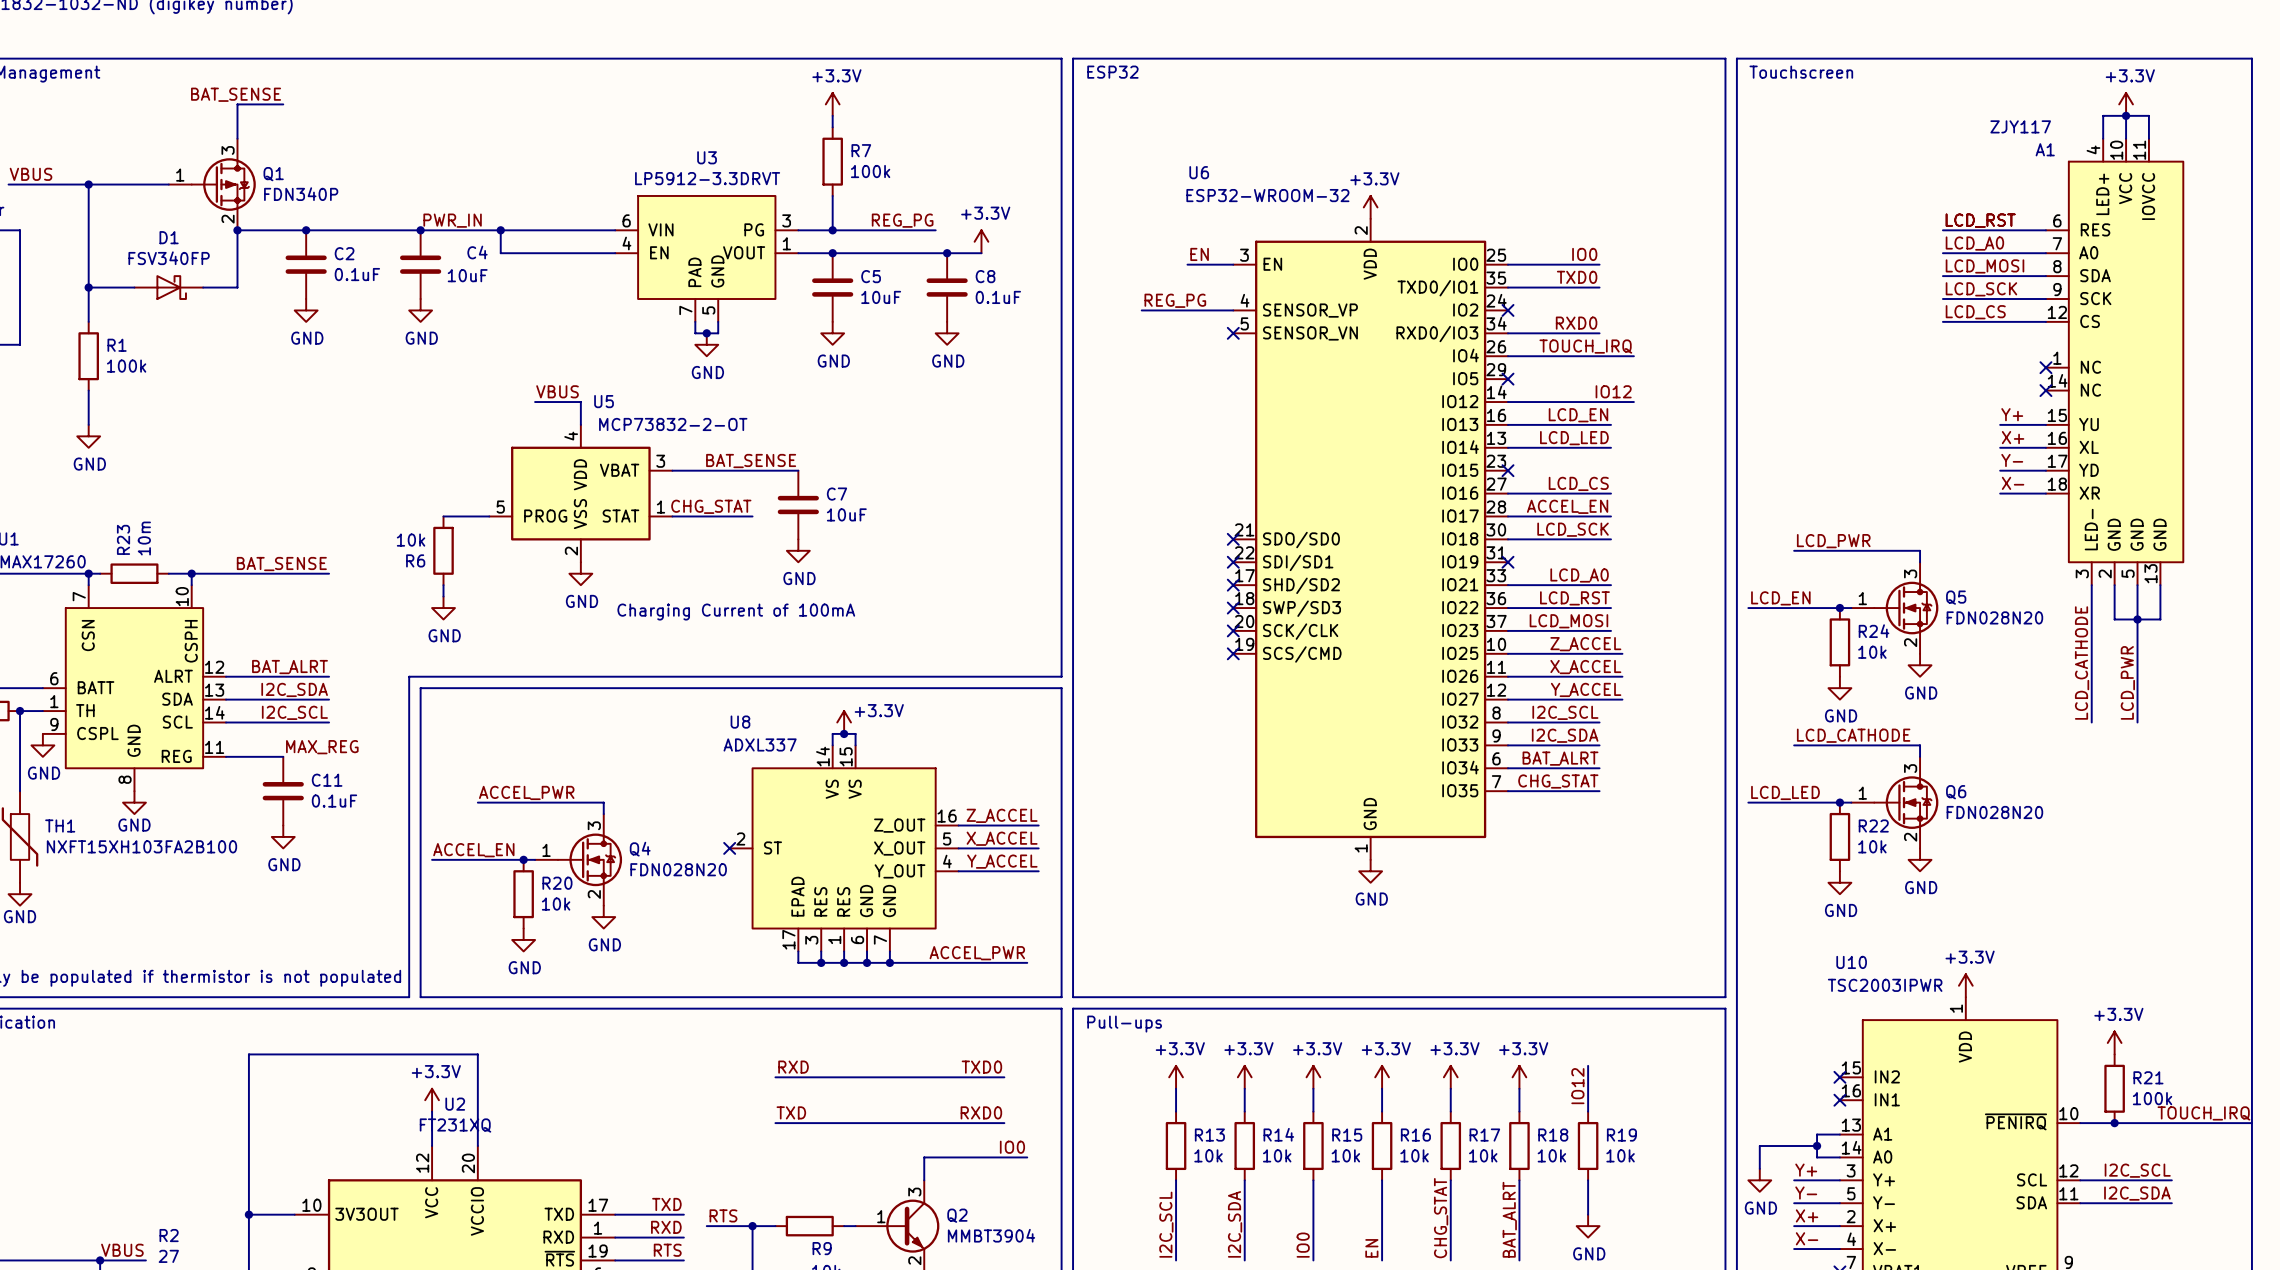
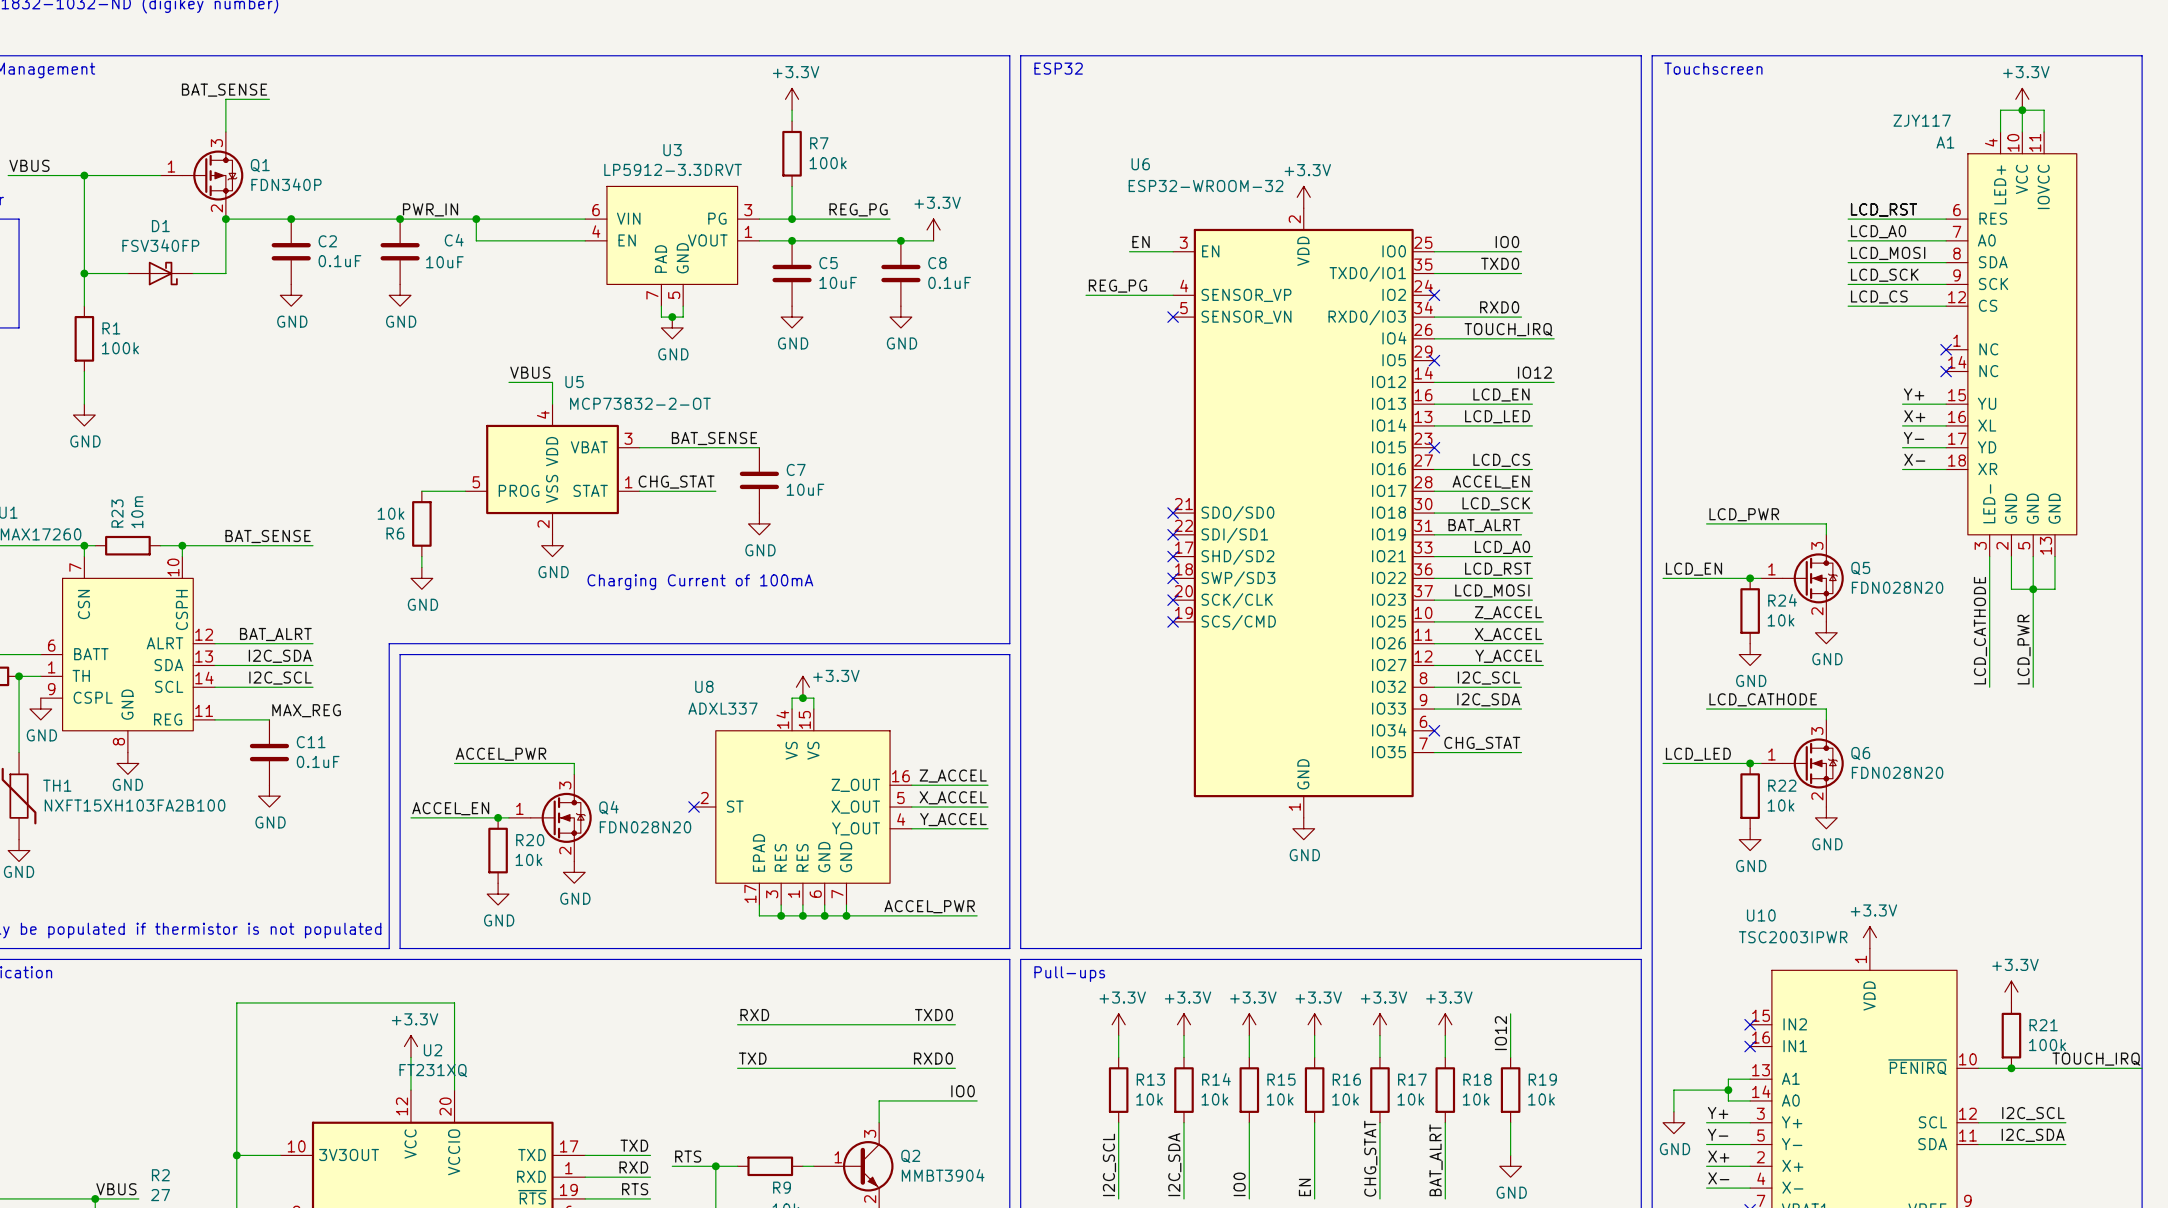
no-connect mark: (1507, 562) -> none
label position: BAT_ALRT (1560, 758) -> BAT_ALRT (1484, 525)
wire: (1507, 768) (1599, 768) -> (1434, 534) (1521, 534)
no-connect mark: none -> (1434, 730)

